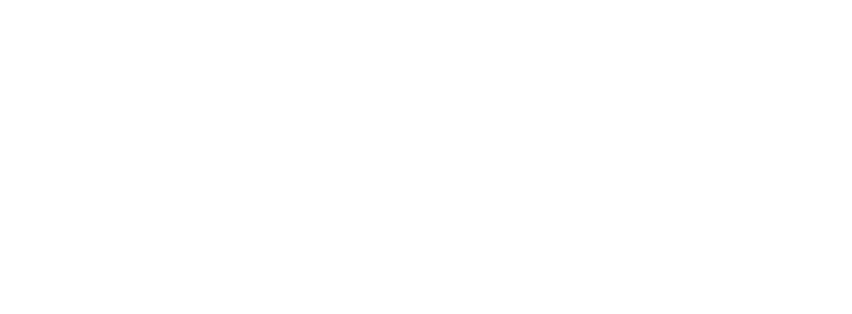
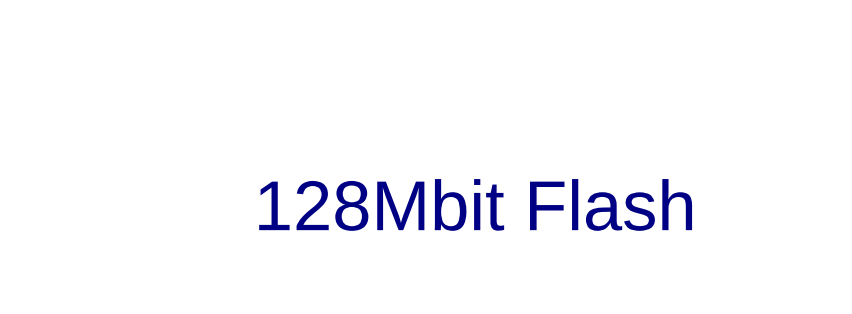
text: none -> 128Mbit Flash (475, 204)

